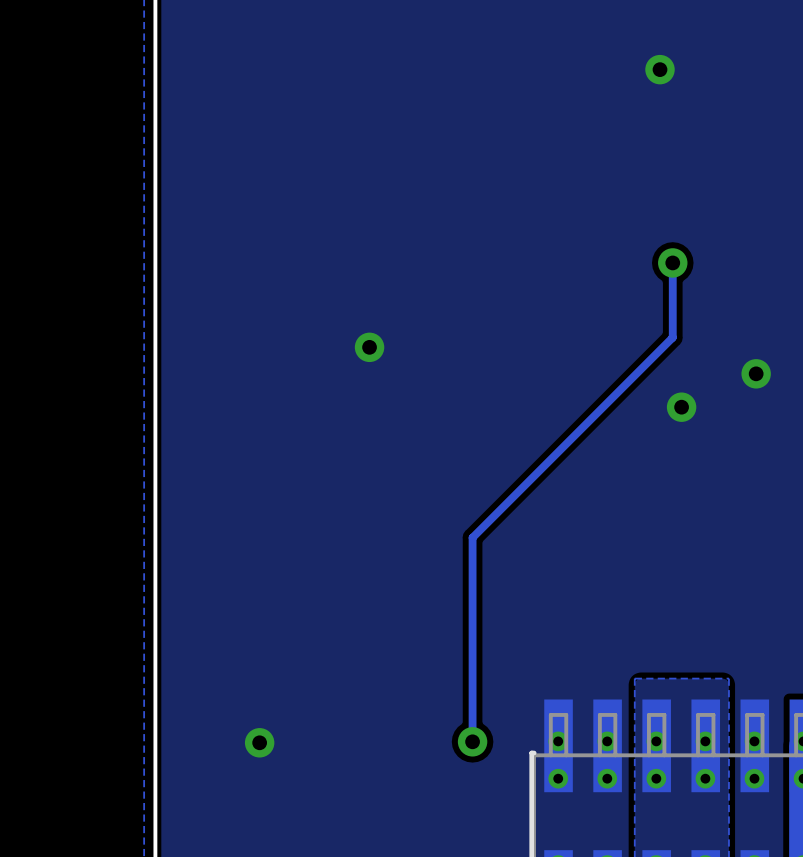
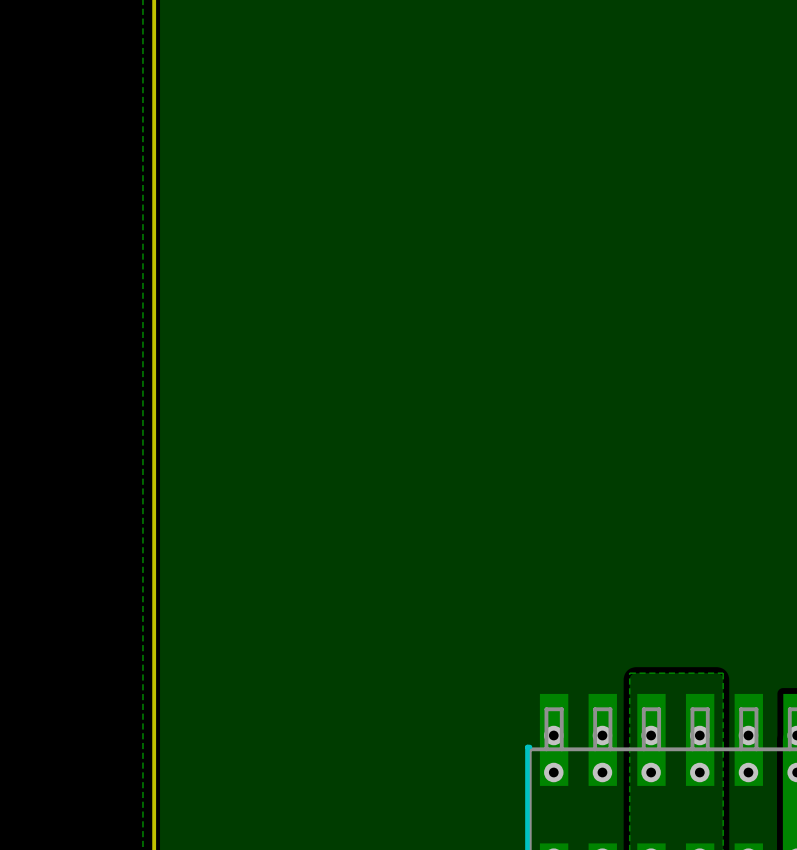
via: (660, 69) -> none
track: (672, 262) (672, 337) (472, 537) (472, 741) -> none
via: (672, 262) -> none
via: (369, 347) -> none
via: (756, 373) -> none
via: (681, 407) -> none
via: (472, 741) -> none
via: (259, 742) -> none

